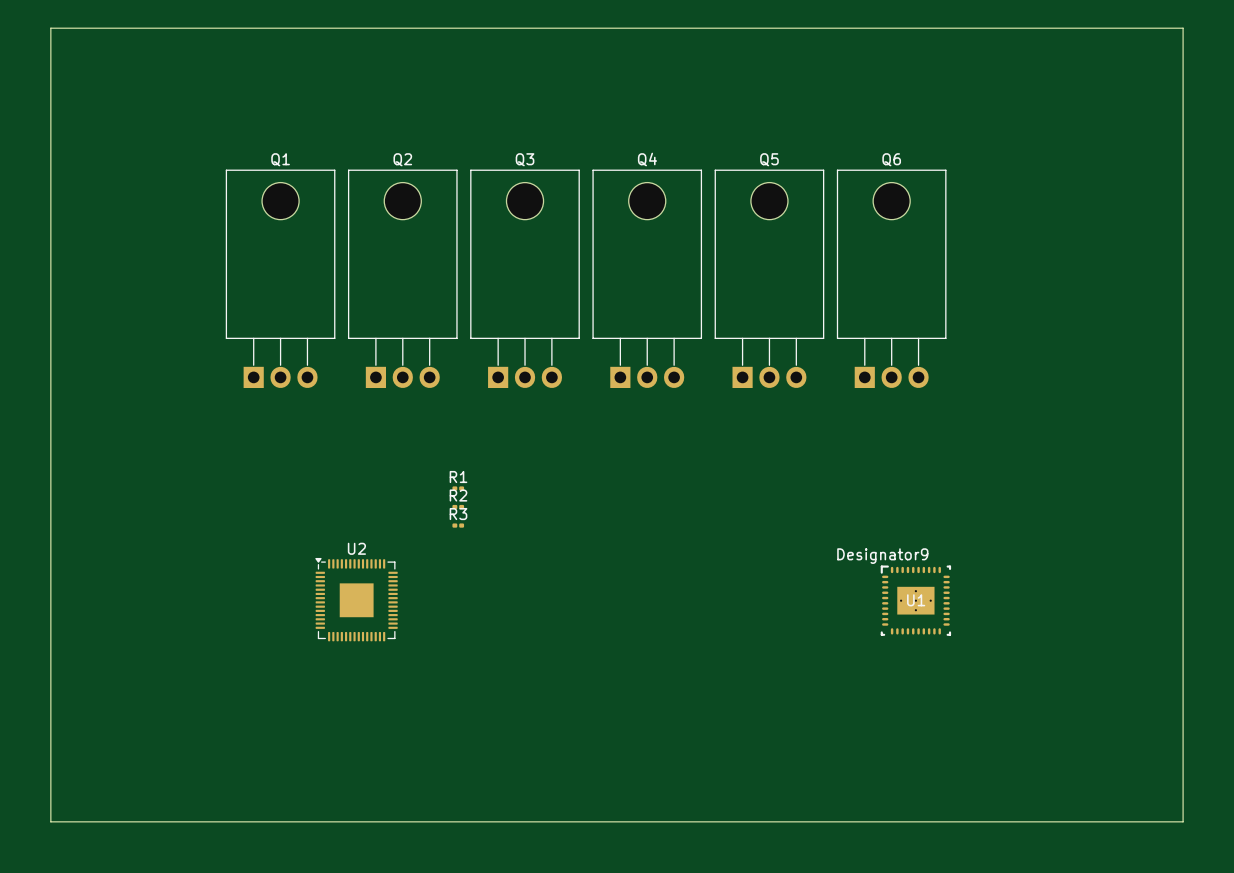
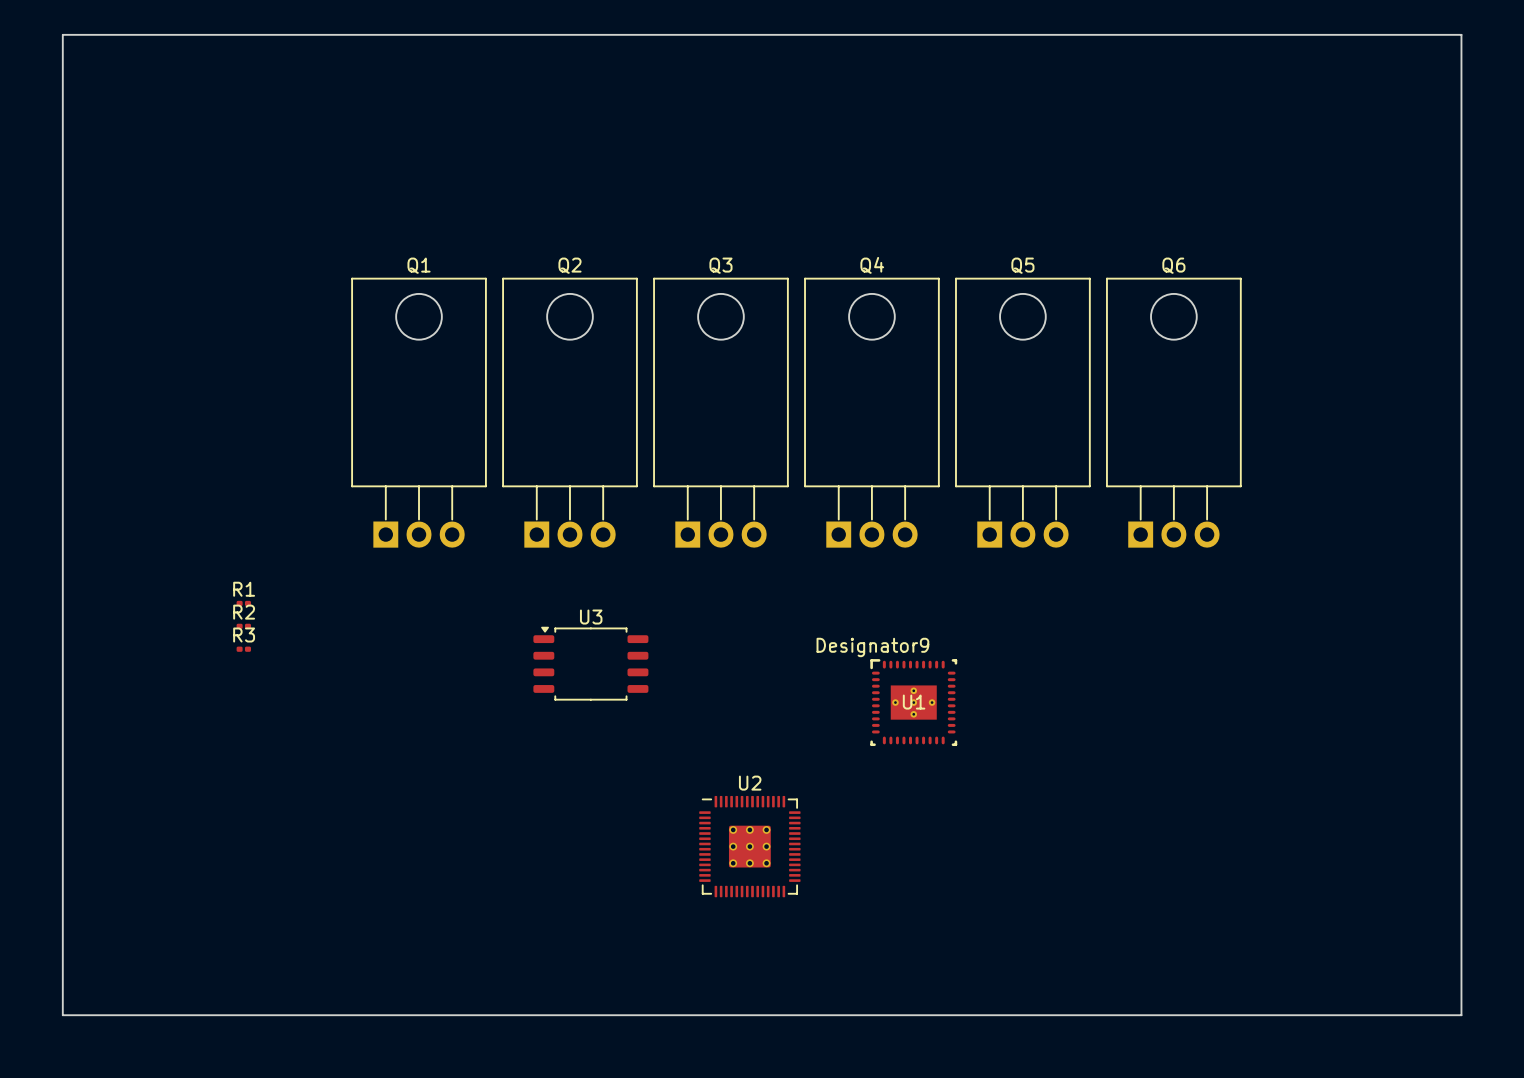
Q1 position: (280, 278) -> (419, 412)
Q2 position: (402, 278) -> (569, 412)
Q3 position: (525, 278) -> (720, 412)
Q4 position: (647, 278) -> (871, 412)
Q5 position: (769, 278) -> (1022, 412)
Q6 position: (891, 278) -> (1173, 412)
R1 position: (458, 488) -> (243, 603)
R2 position: (458, 507) -> (243, 626)
R3 position: (458, 525) -> (243, 649)
U3: none -> (590, 663)
U2 footprint: [315, 557, 398, 642] -> [699, 795, 801, 898]
U1 position: (915, 600) -> (913, 702)

